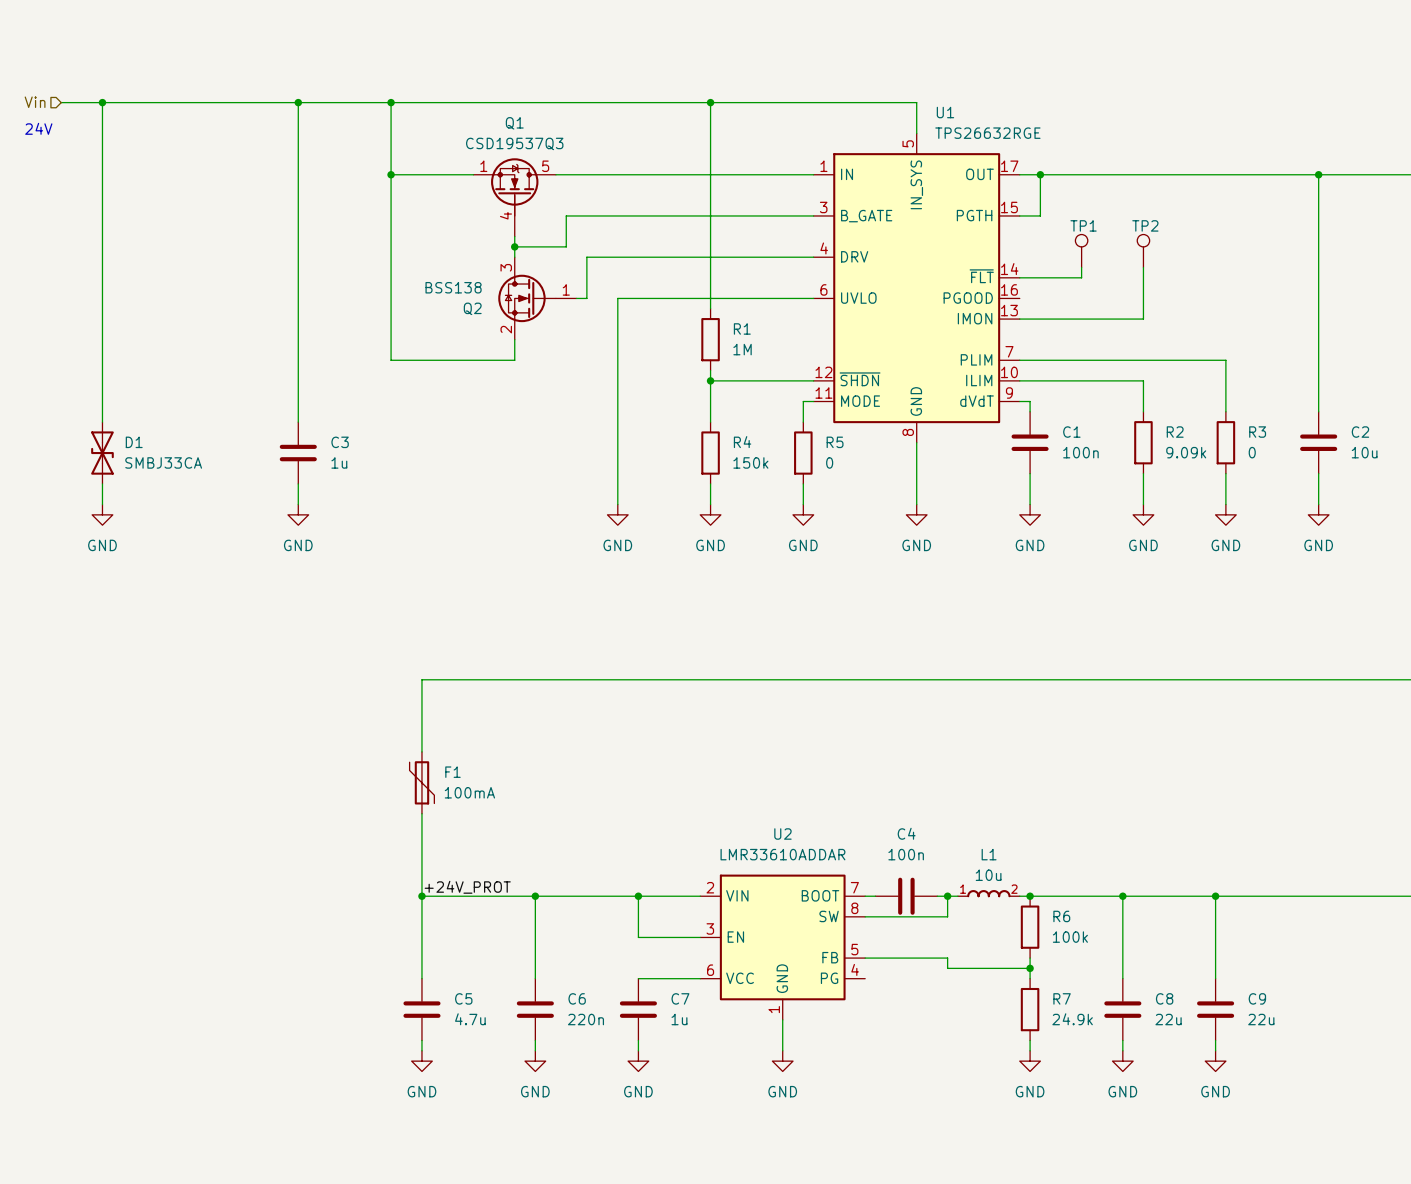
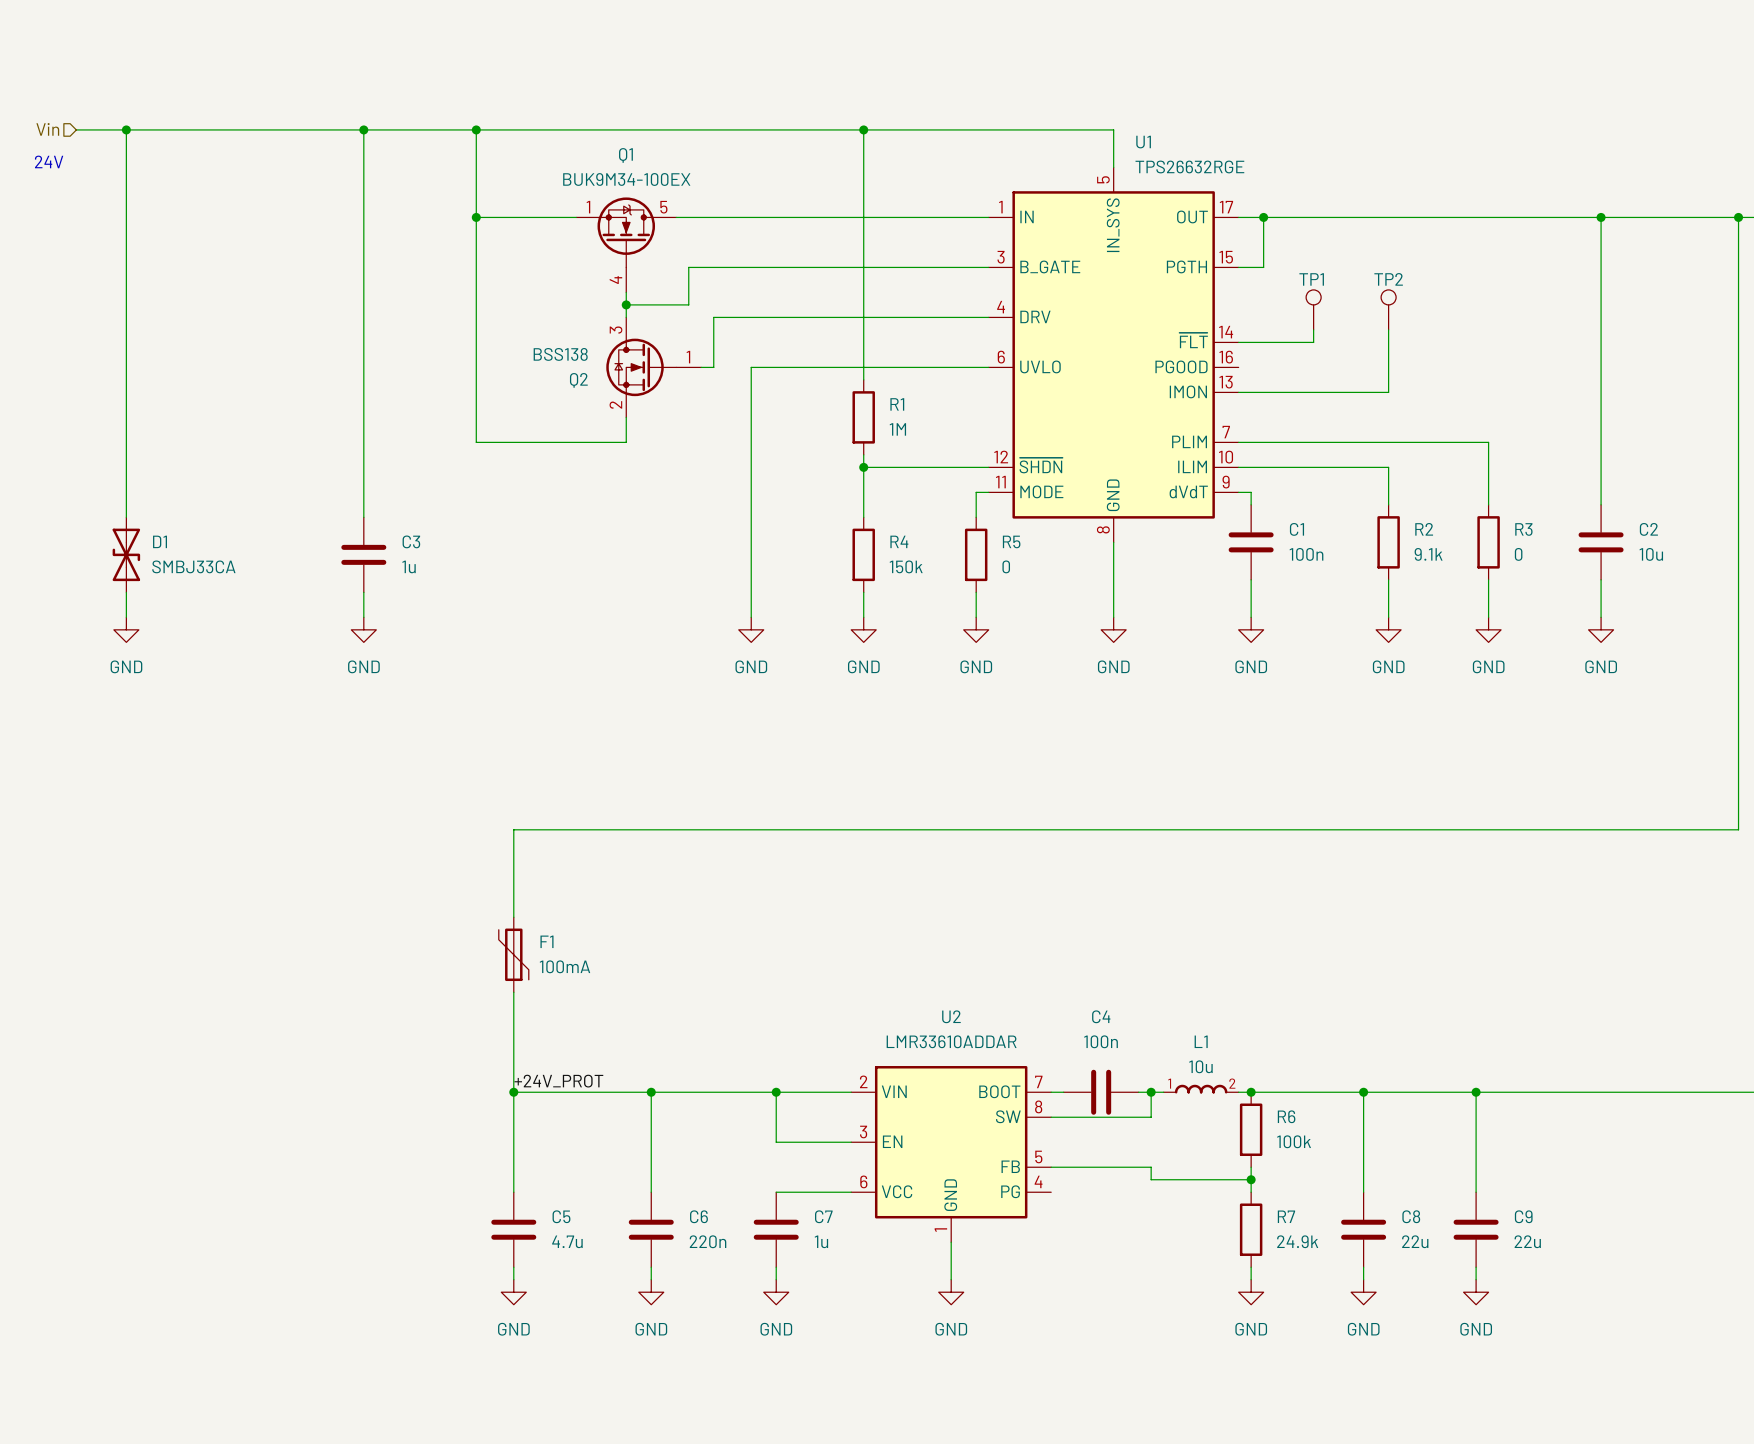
Q1 value: CSD19537Q3 (514, 143) -> BUK9M34-100EX (626, 179)
Q1 symbol: [473, 158, 556, 237] -> [576, 197, 677, 293]
R2 value: 9.09k (1186, 452) -> 9.1k (1428, 554)

